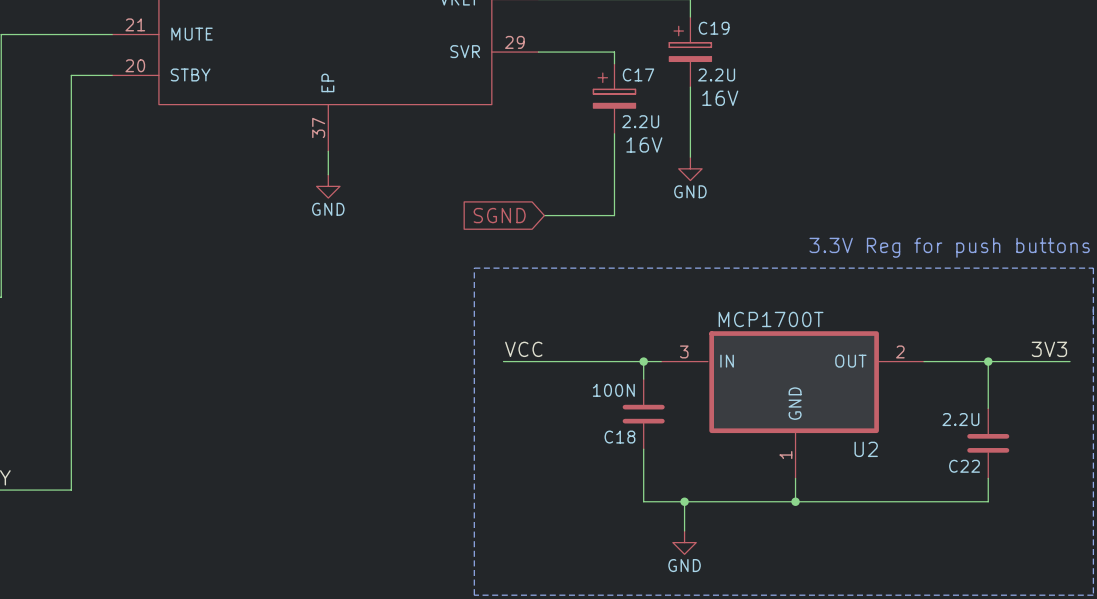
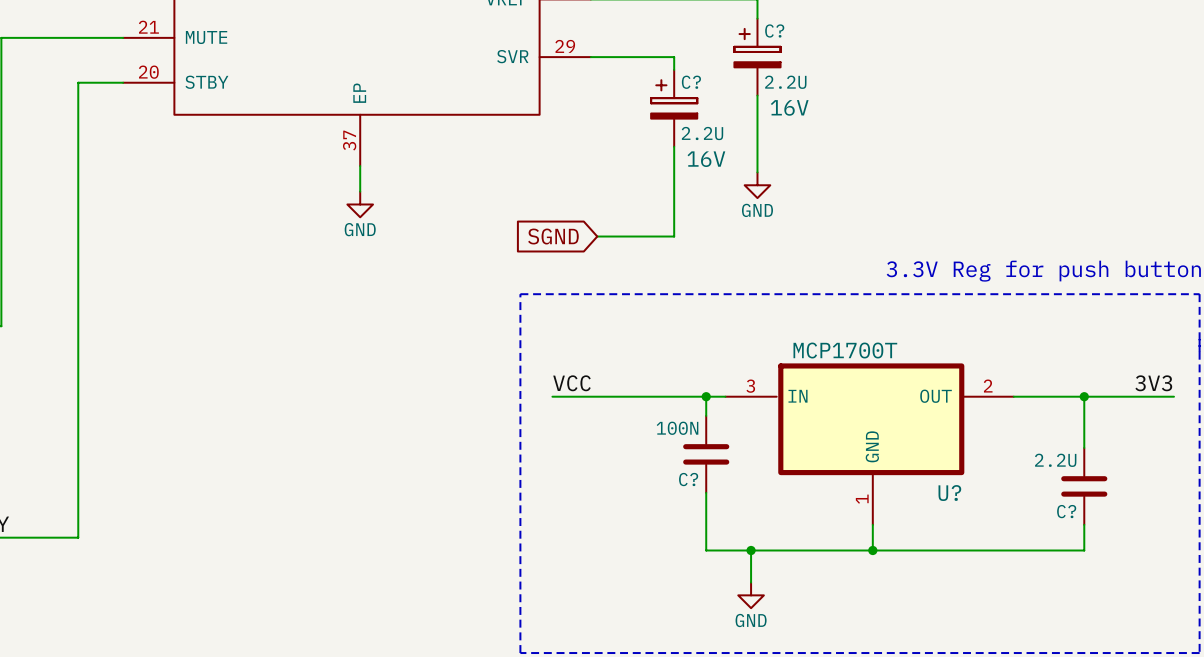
C19 name: C19 (714, 28) -> C? (774, 30)
C17 name: C17 (638, 74) -> C? (691, 82)
C18 name: C18 (619, 437) -> C? (688, 479)
U2 name: U2 (866, 449) -> U? (949, 493)
C22 name: C22 (964, 466) -> C? (1066, 511)

